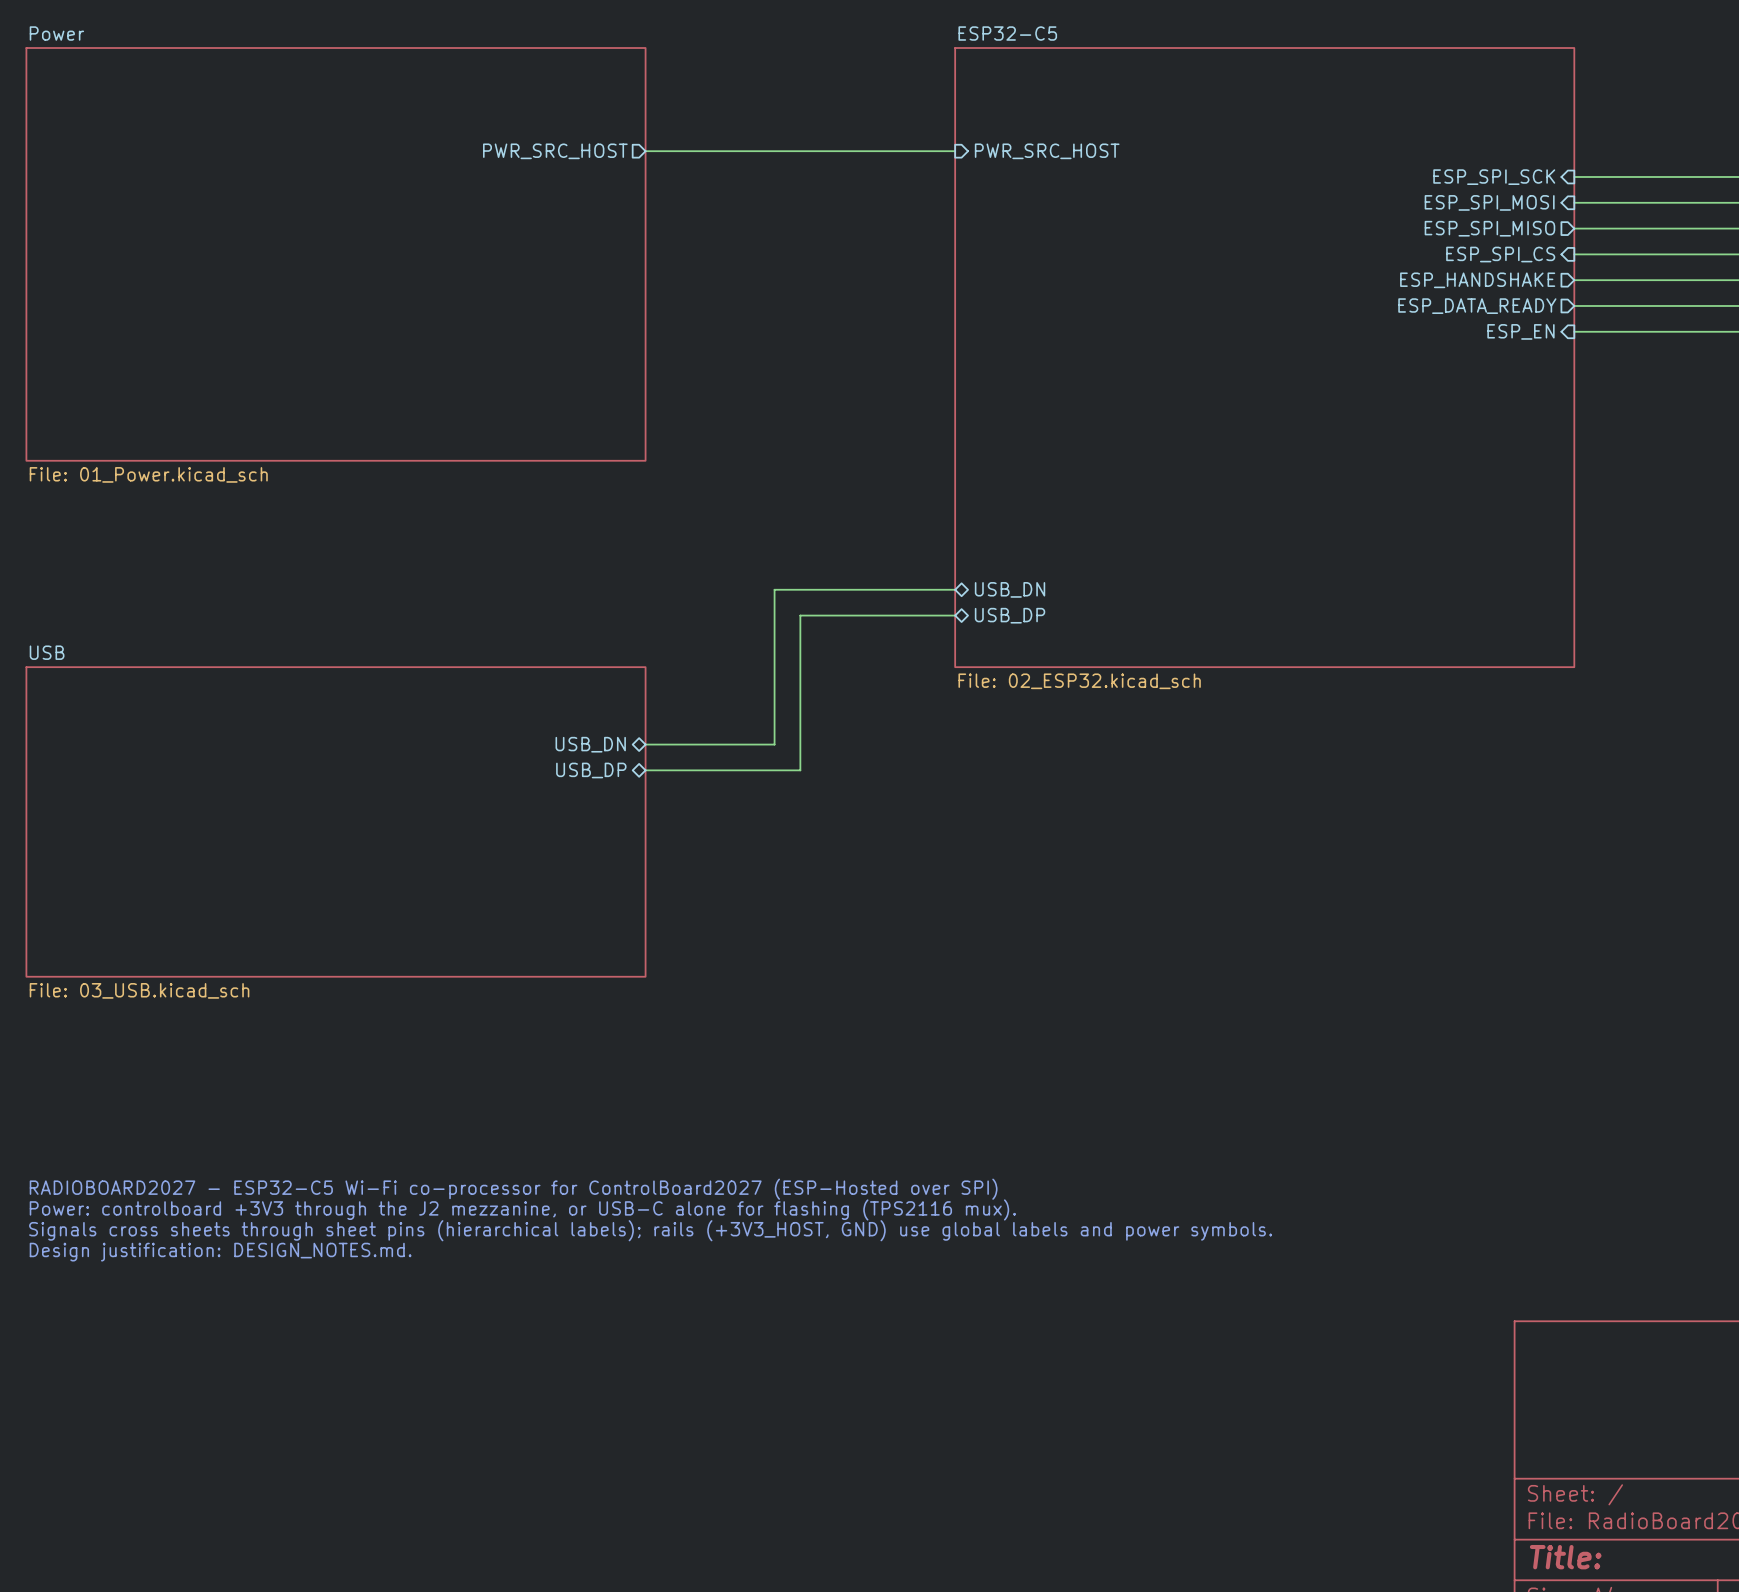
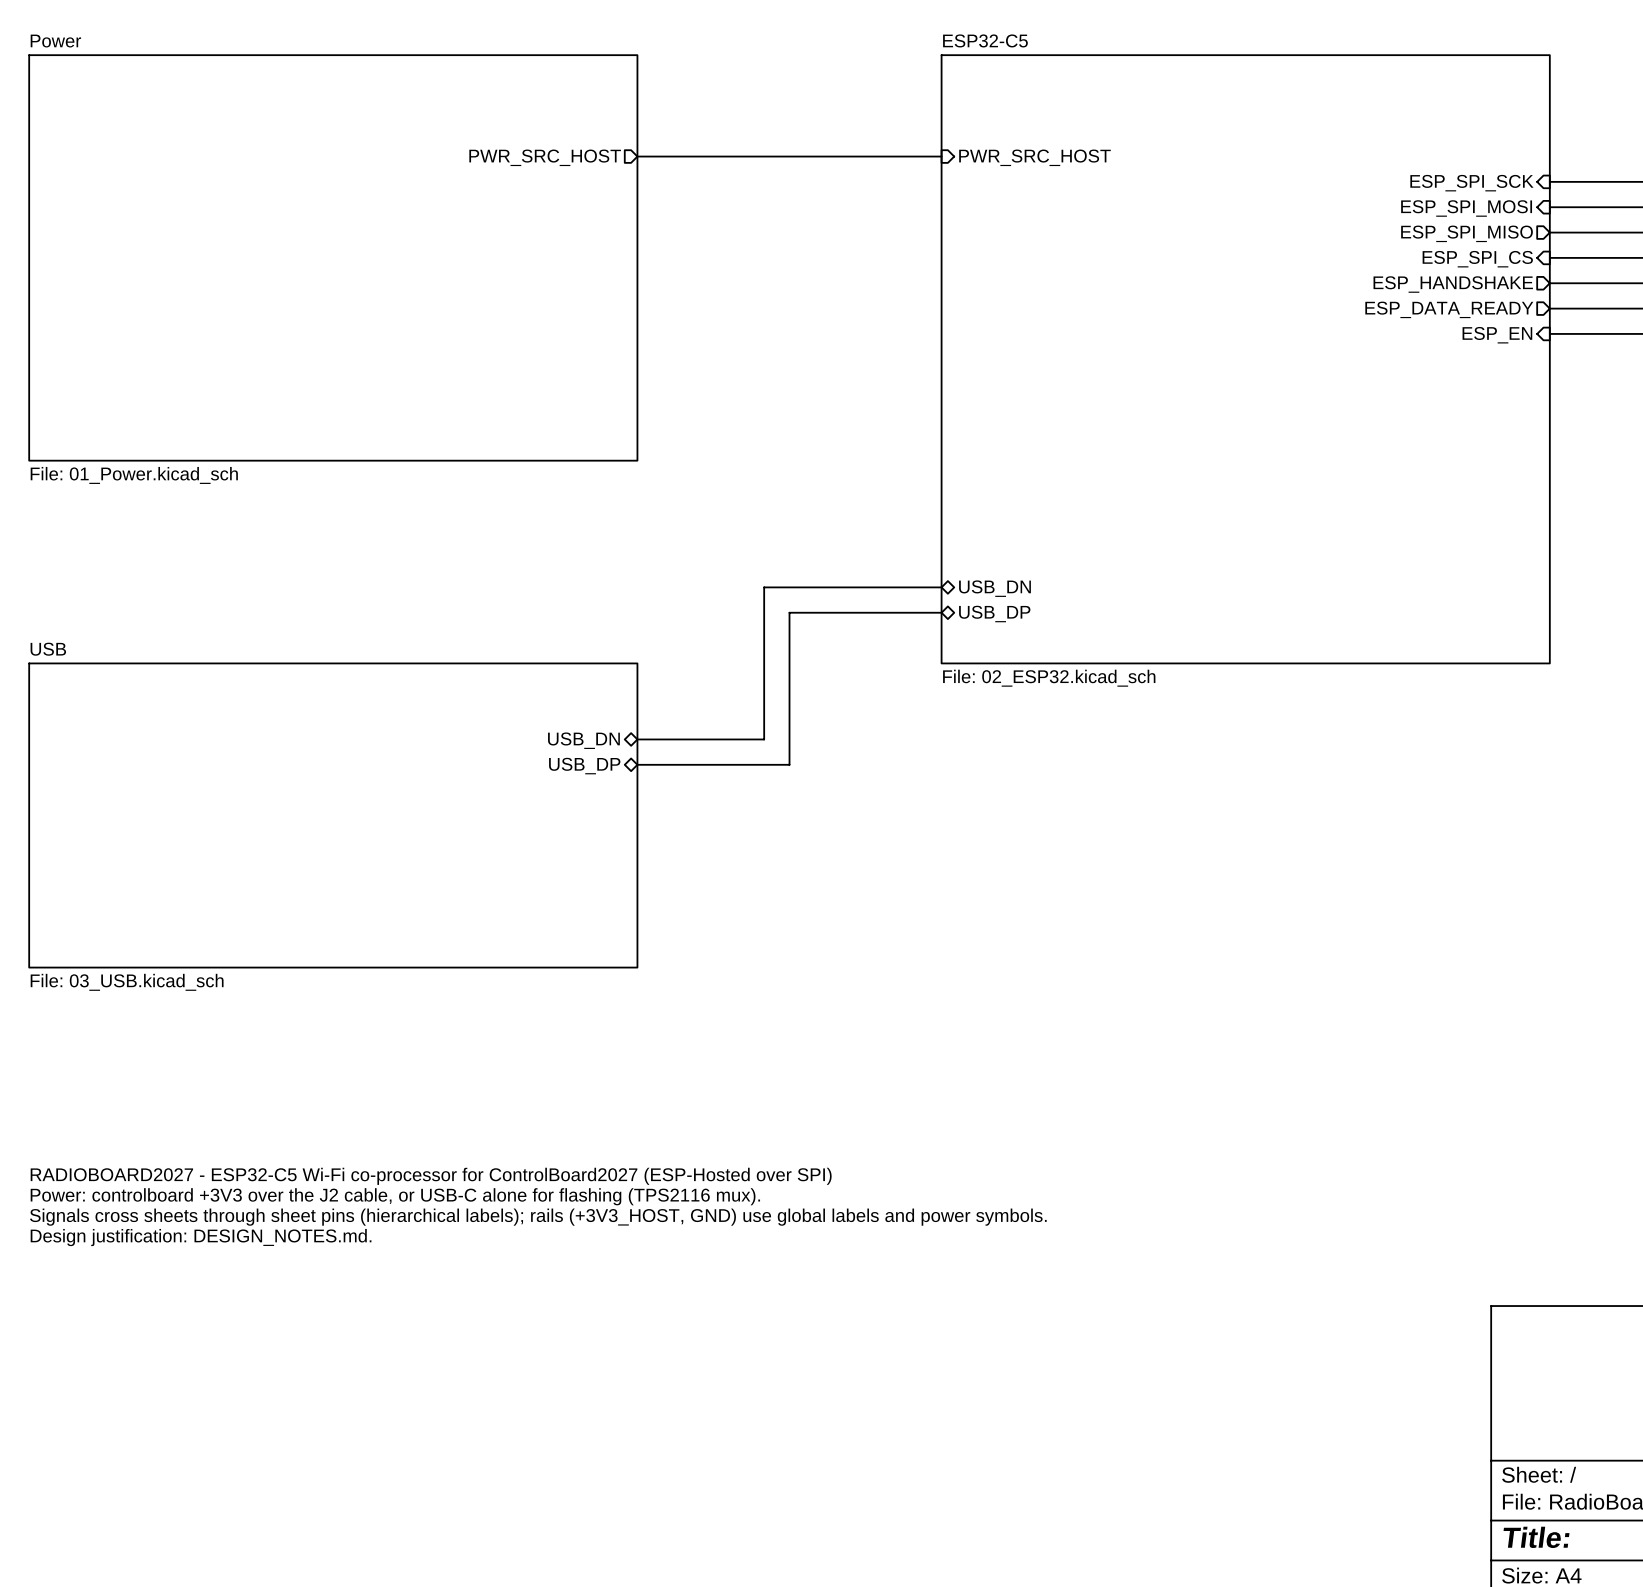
text: Power: controlboard +3V3 through the J2 mezzanine, or USB-C alone for flashing (TPS2116 mux). (522, 1209) -> Power: controlboard +3V3 over the J2 cable, or USB-C alone for flashing (TPS2116 mux). (395, 1196)

